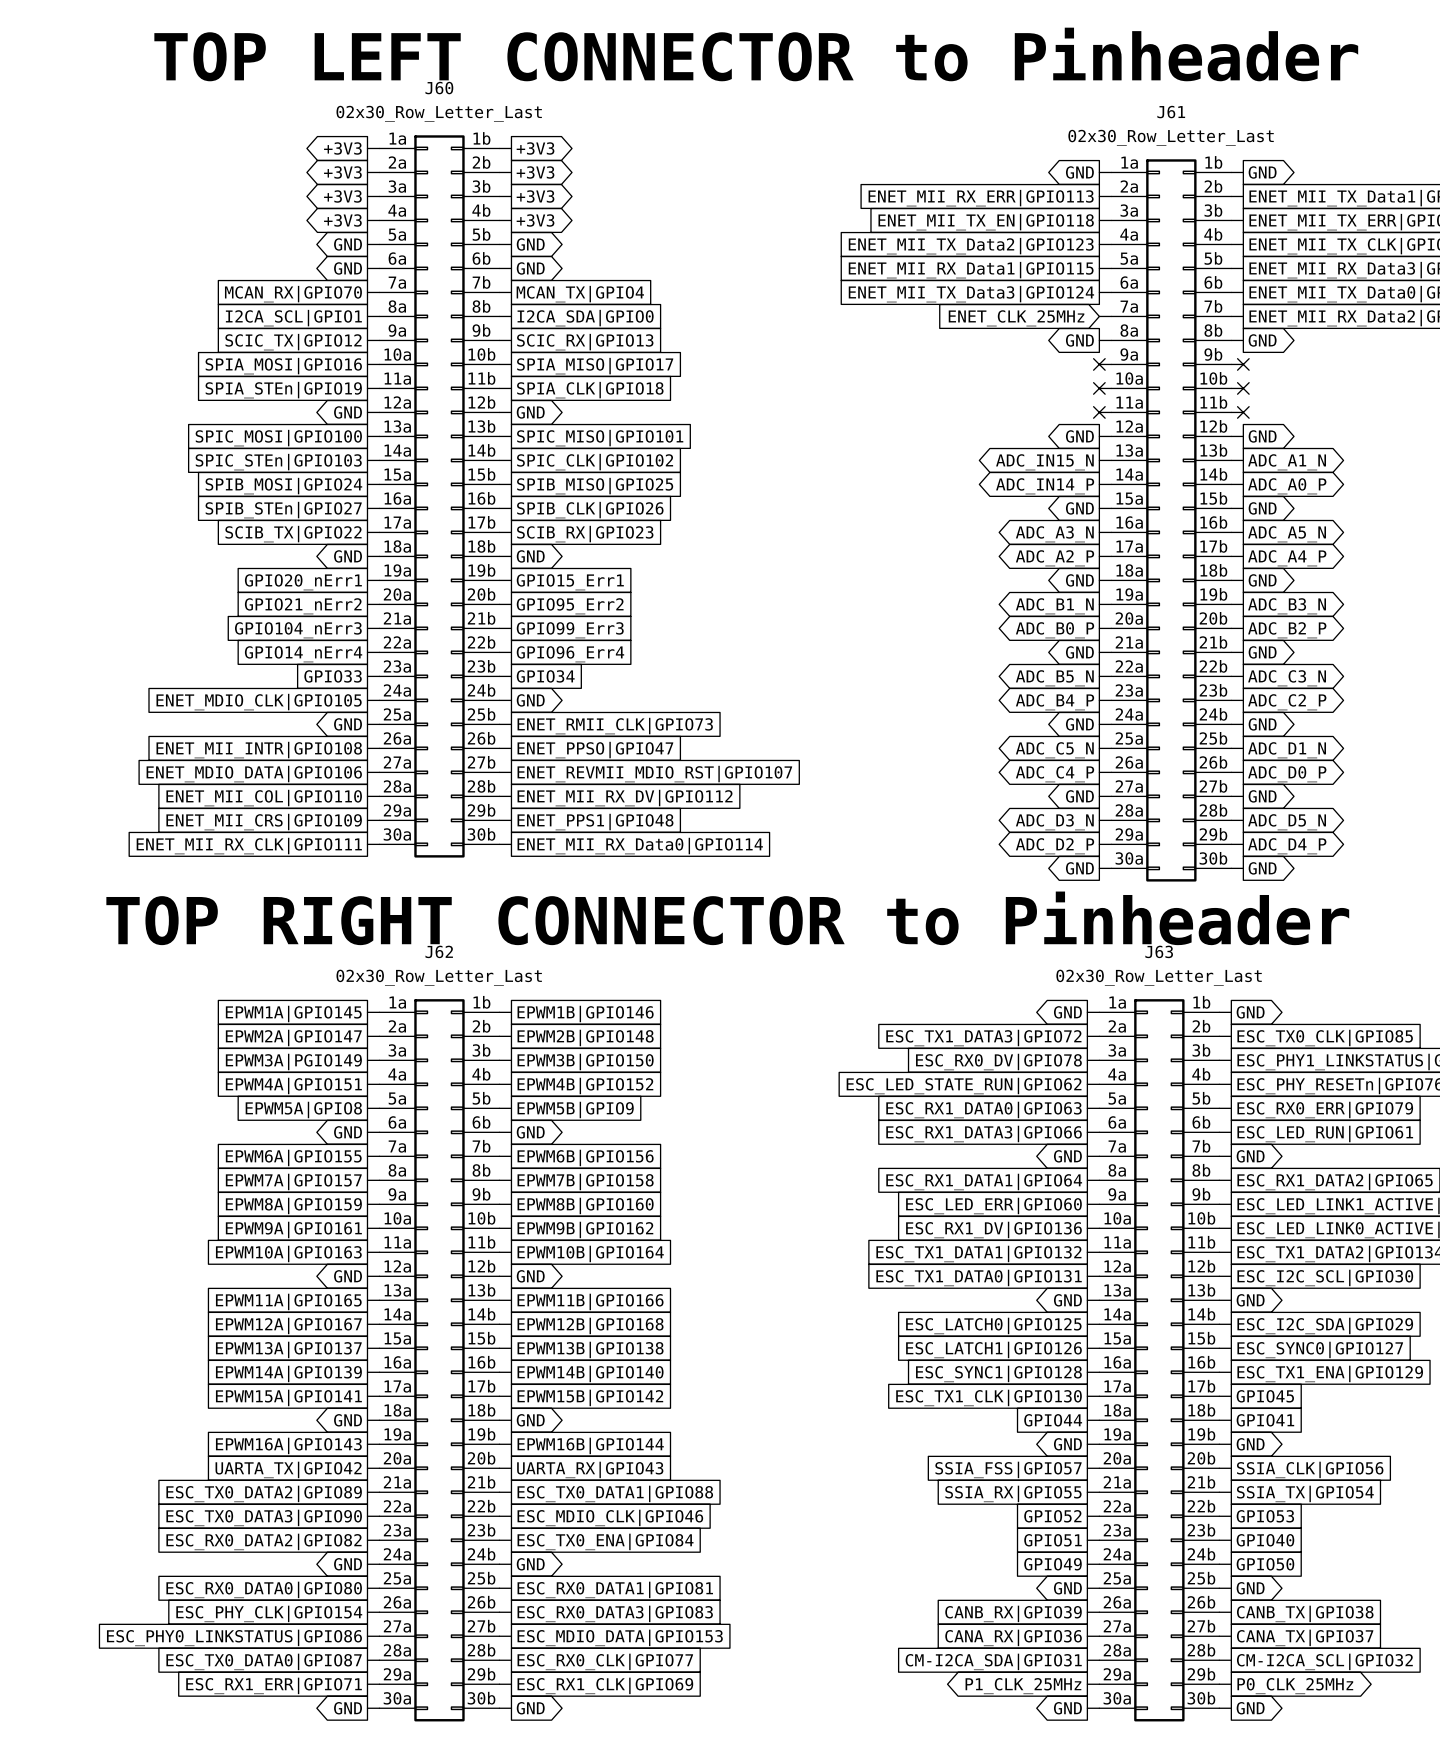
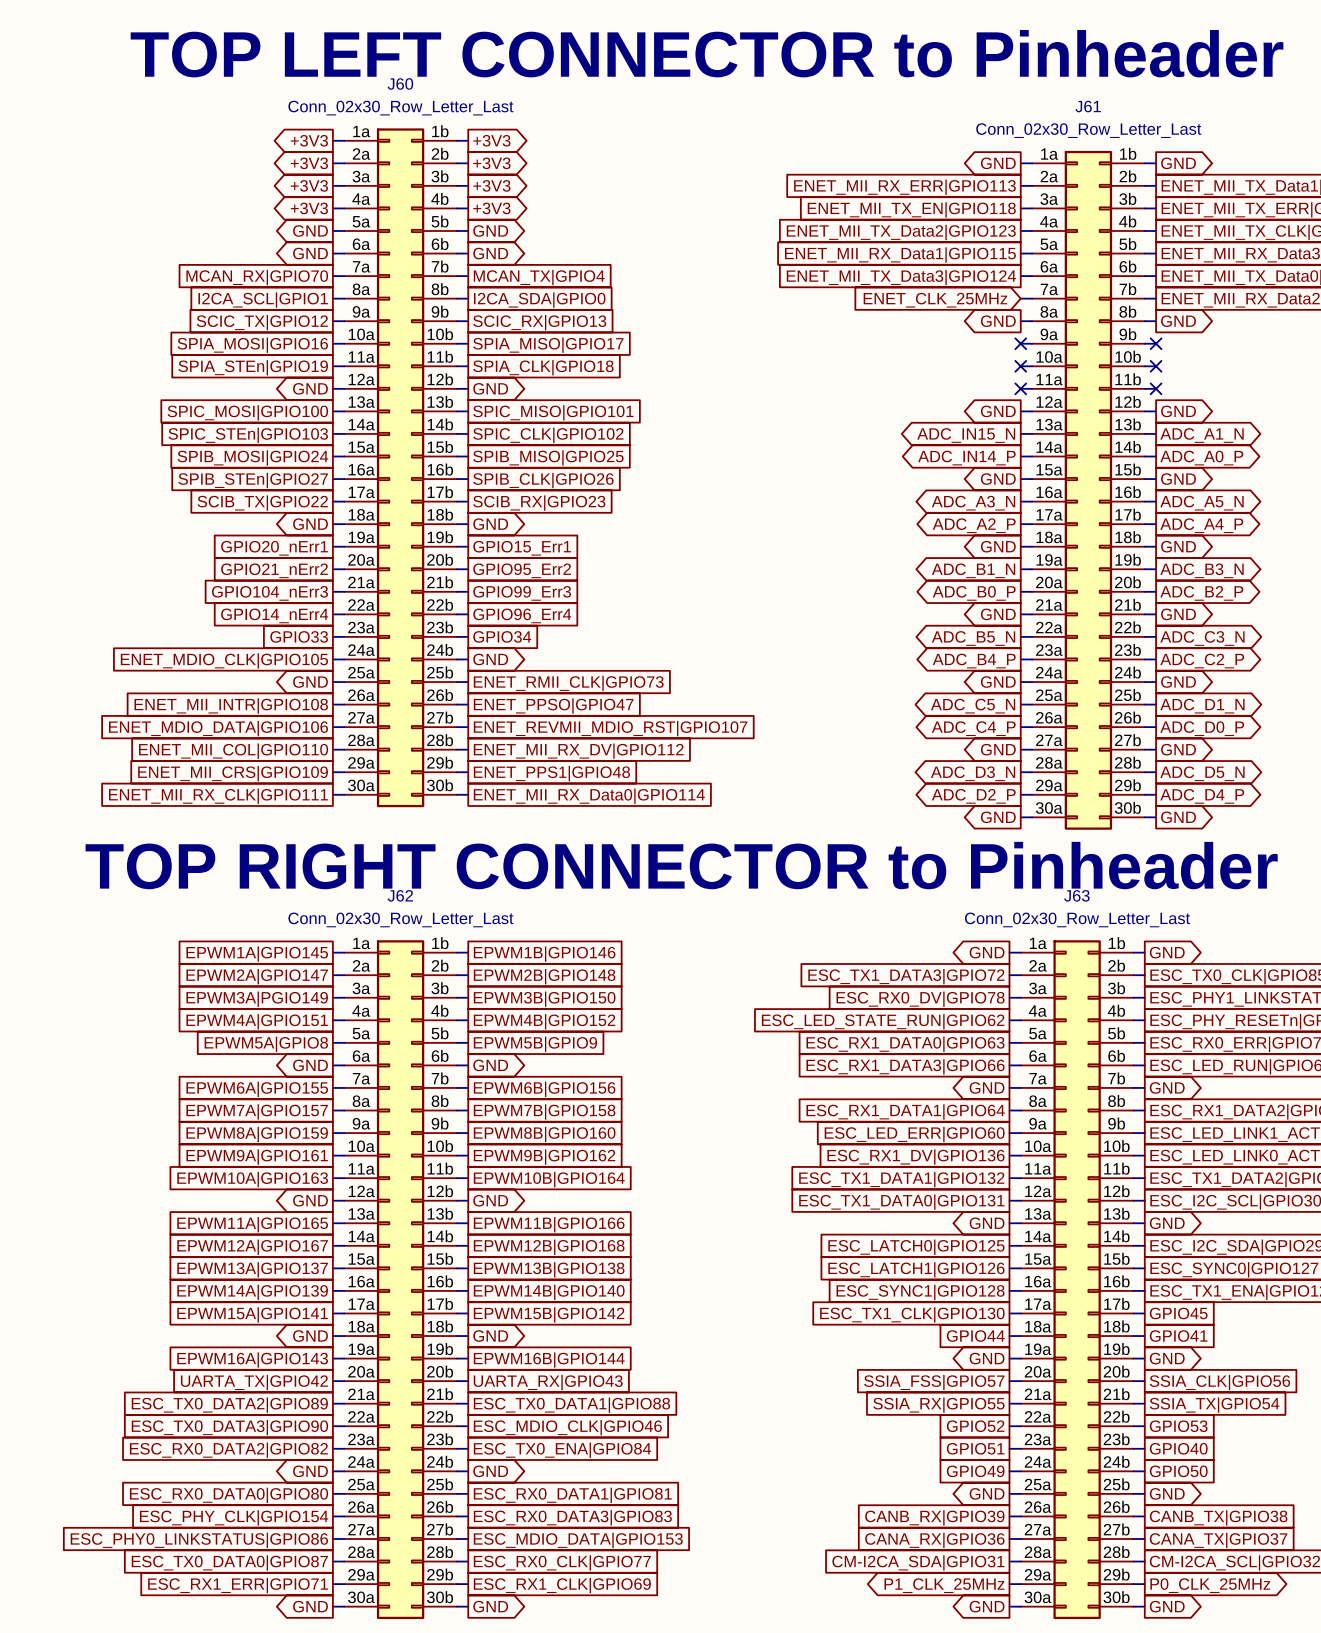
J60 value: 02x30_Row_Letter_Last (439, 113) -> Conn_02x30_Row_Letter_Last (400, 108)
J61 value: 02x30_Row_Letter_Last (1171, 137) -> Conn_02x30_Row_Letter_Last (1088, 130)
J62 value: 02x30_Row_Letter_Last (439, 977) -> Conn_02x30_Row_Letter_Last (400, 919)
J63 value: 02x30_Row_Letter_Last (1159, 977) -> Conn_02x30_Row_Letter_Last (1077, 919)

